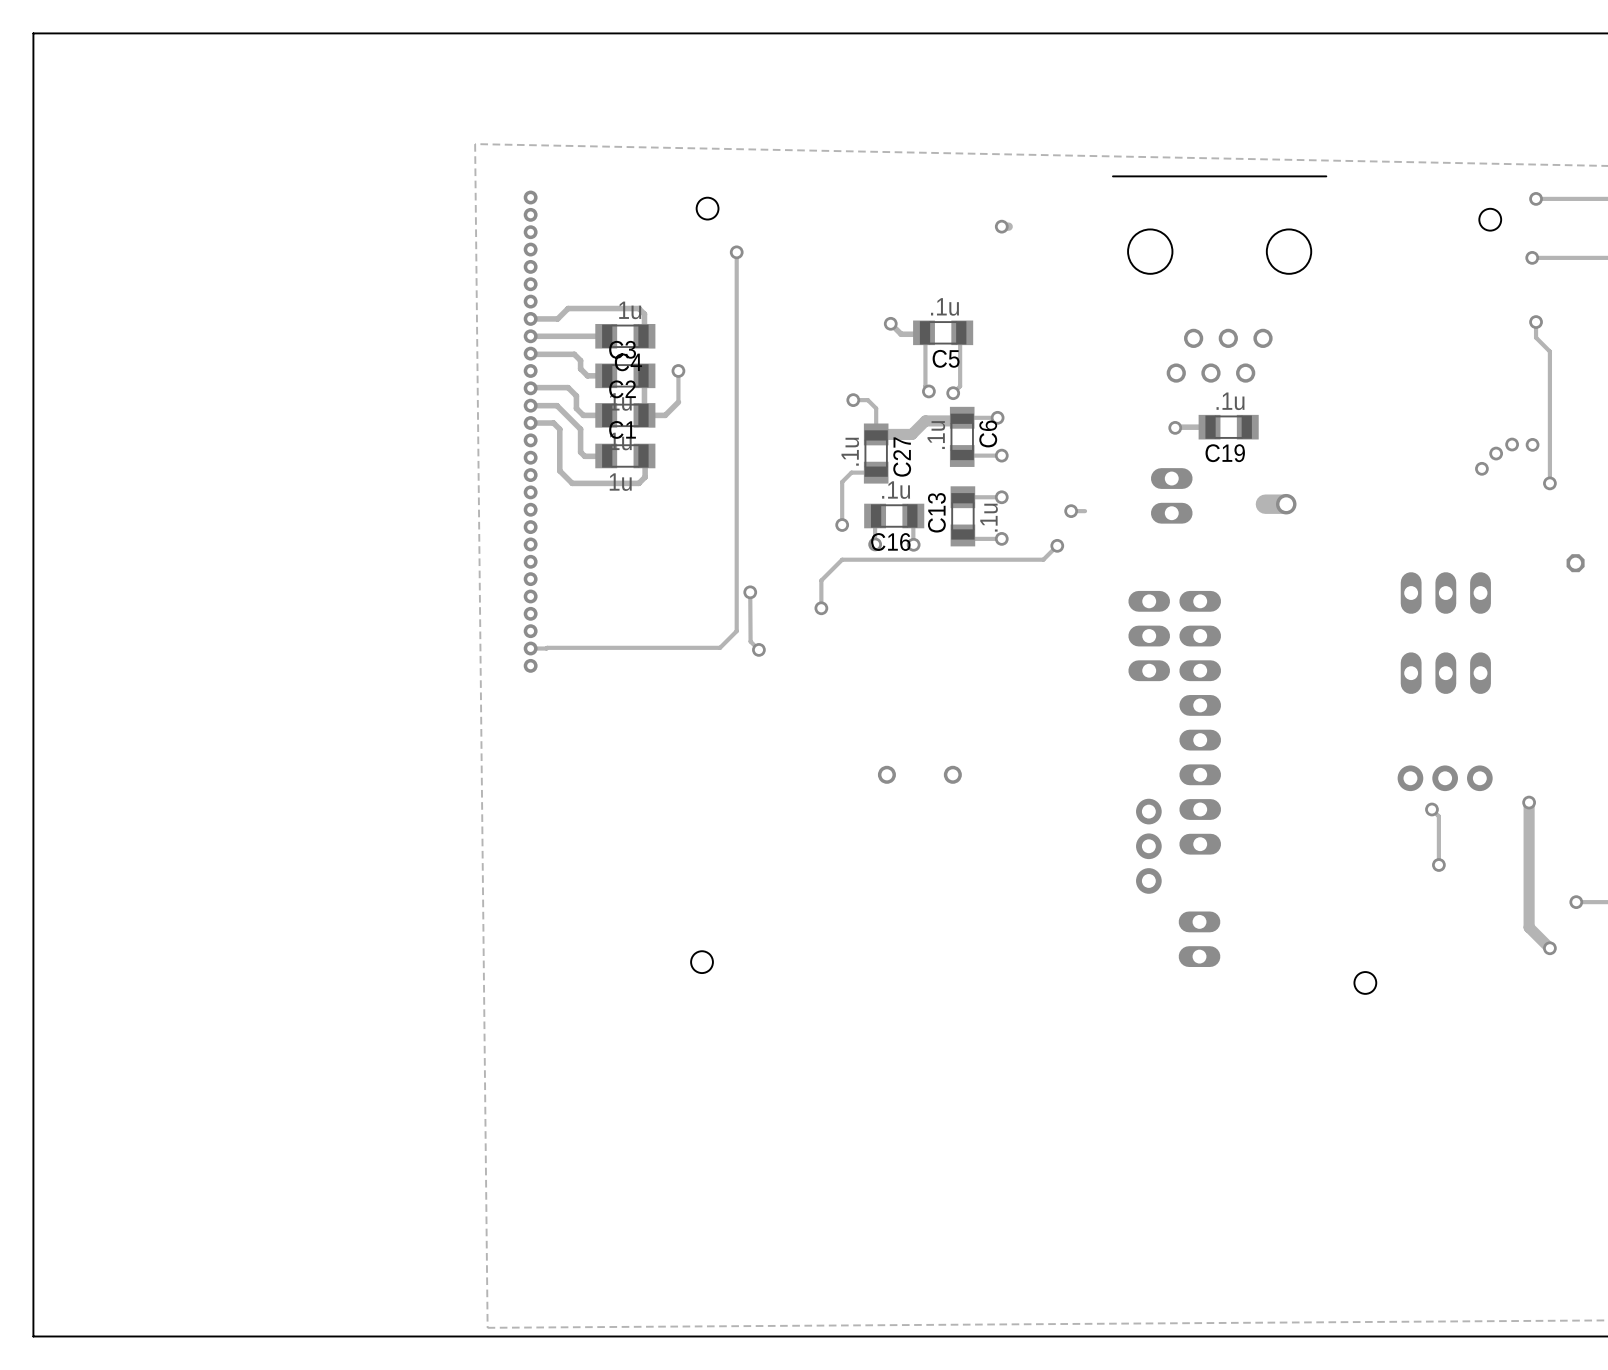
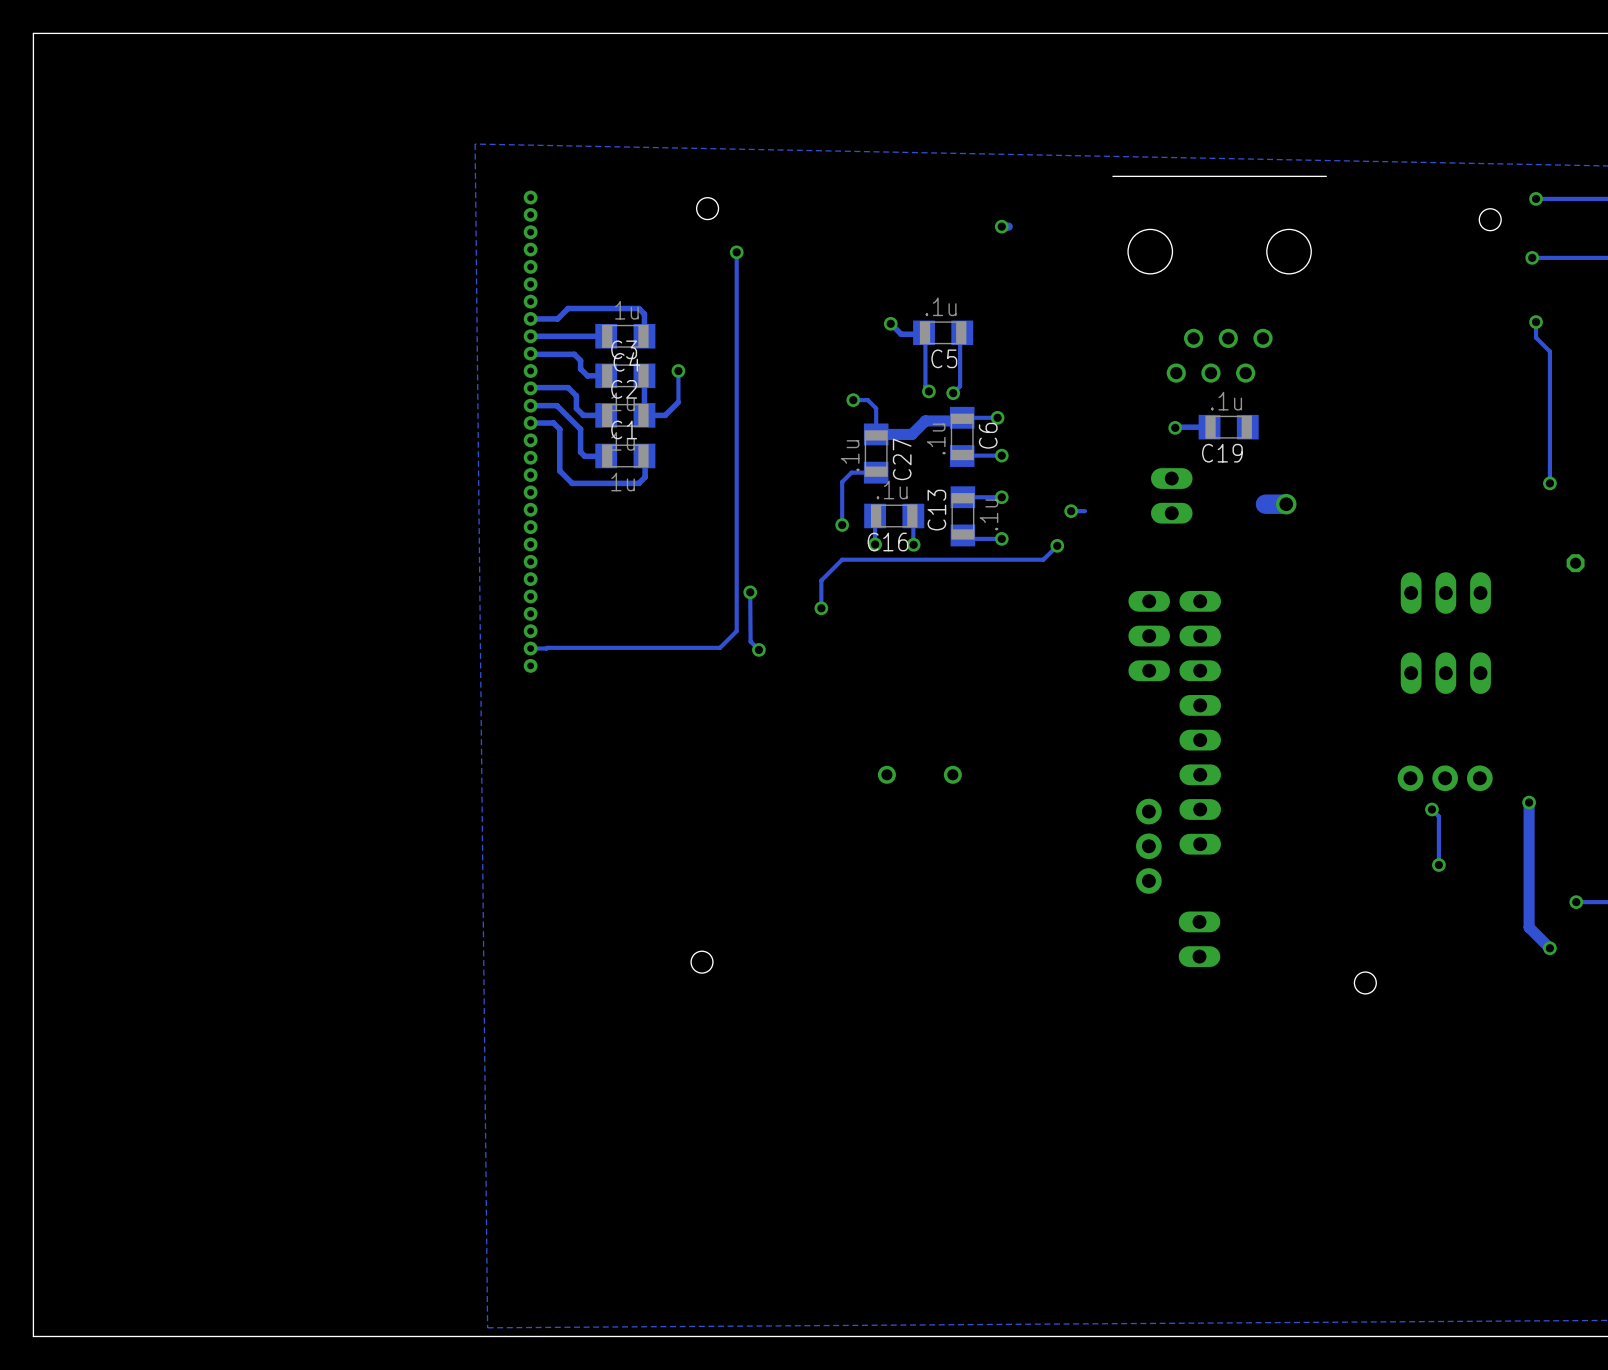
via: (1512, 444) -> none
via: (1532, 444) -> none
via: (1496, 453) -> none
via: (1481, 468) -> none

